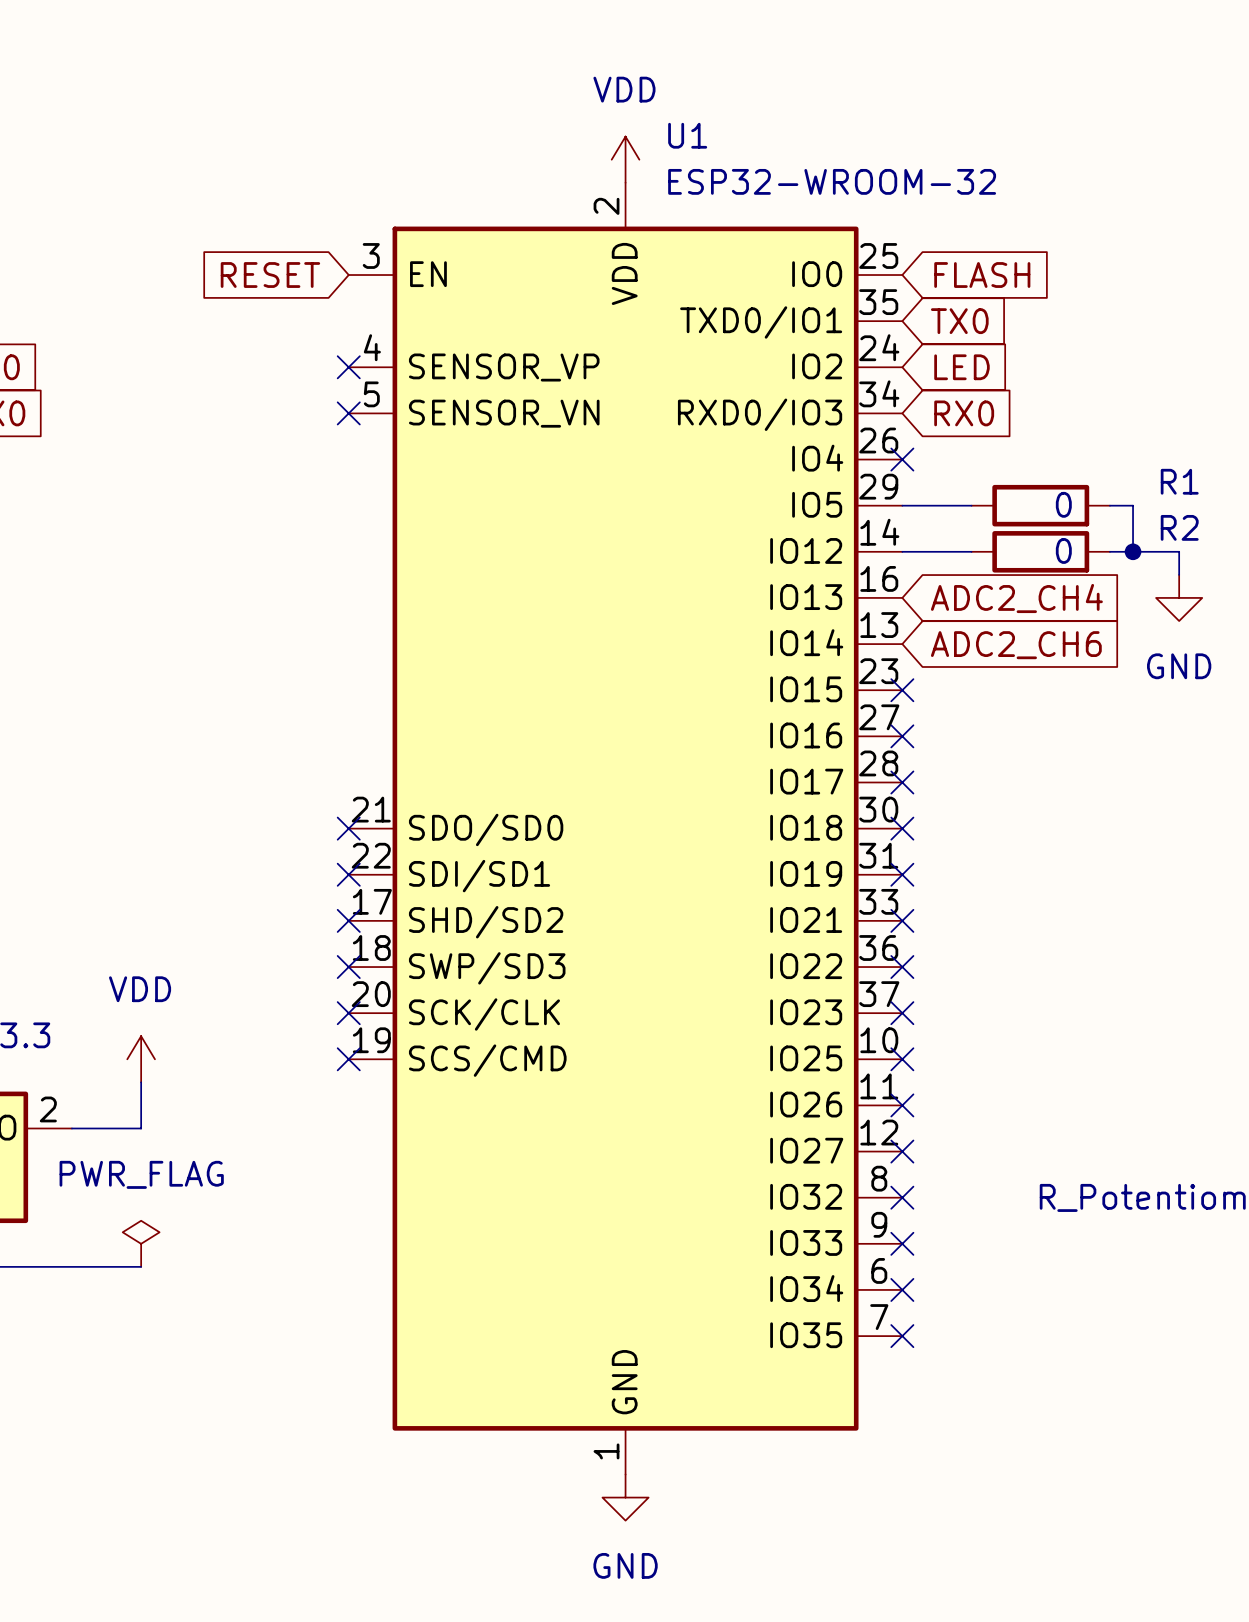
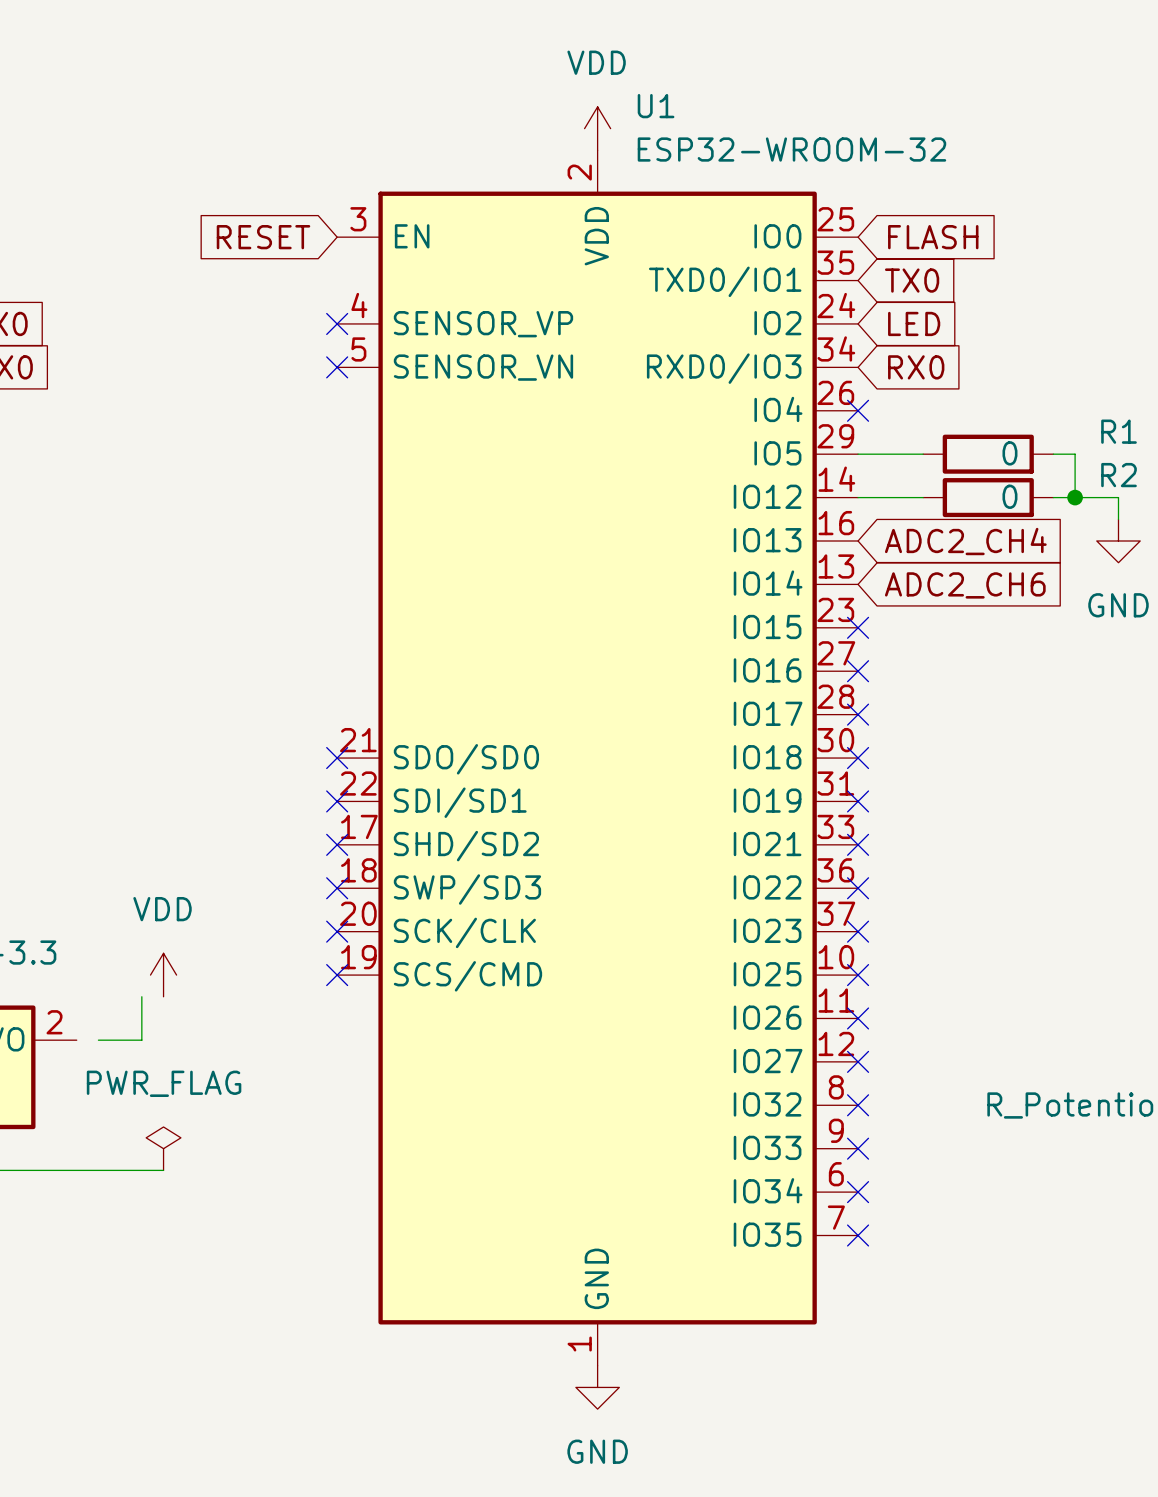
power symbol position: VDD (141, 1059) -> VDD (163, 975)
wire: (71, 1128) (95, 1128) -> (141, 1170) (163, 1170)
power symbol position: PWR_FLAG (141, 1243) -> PWR_FLAG (163, 1148)

